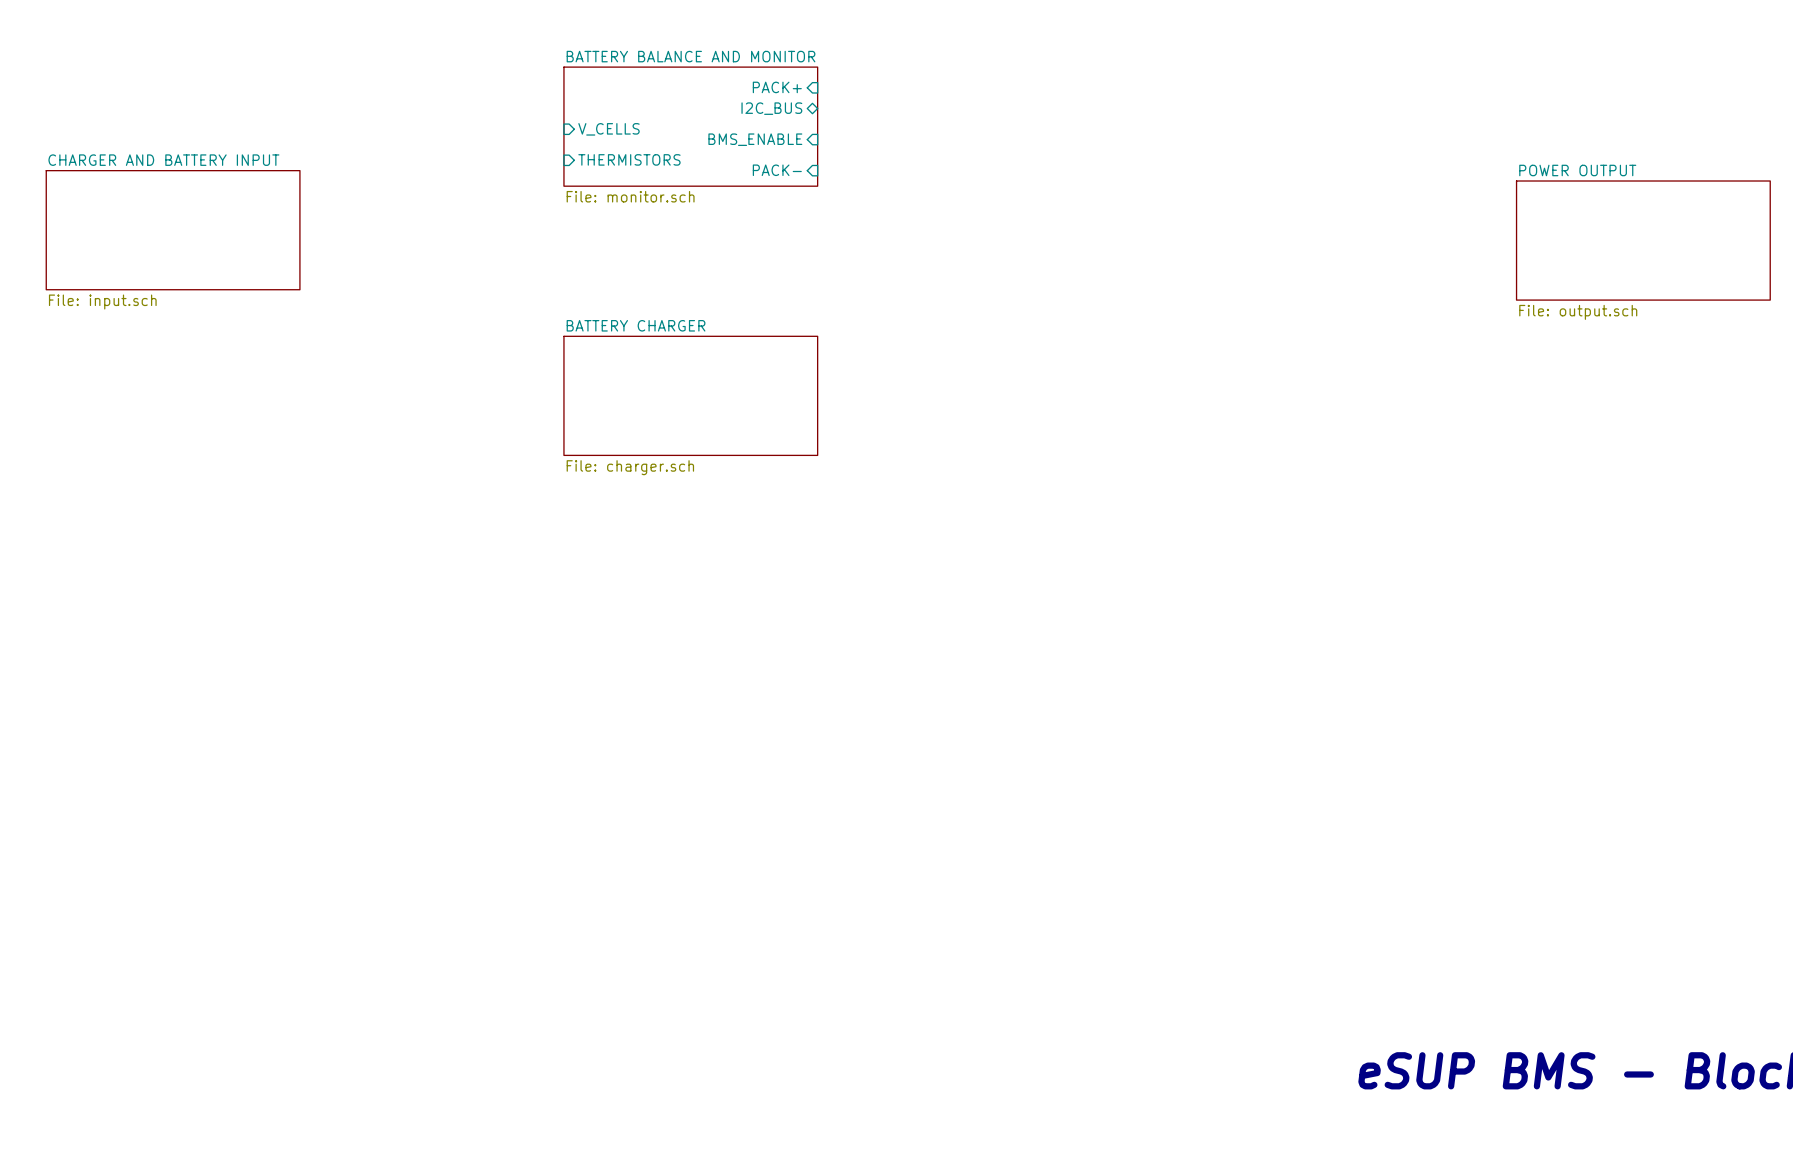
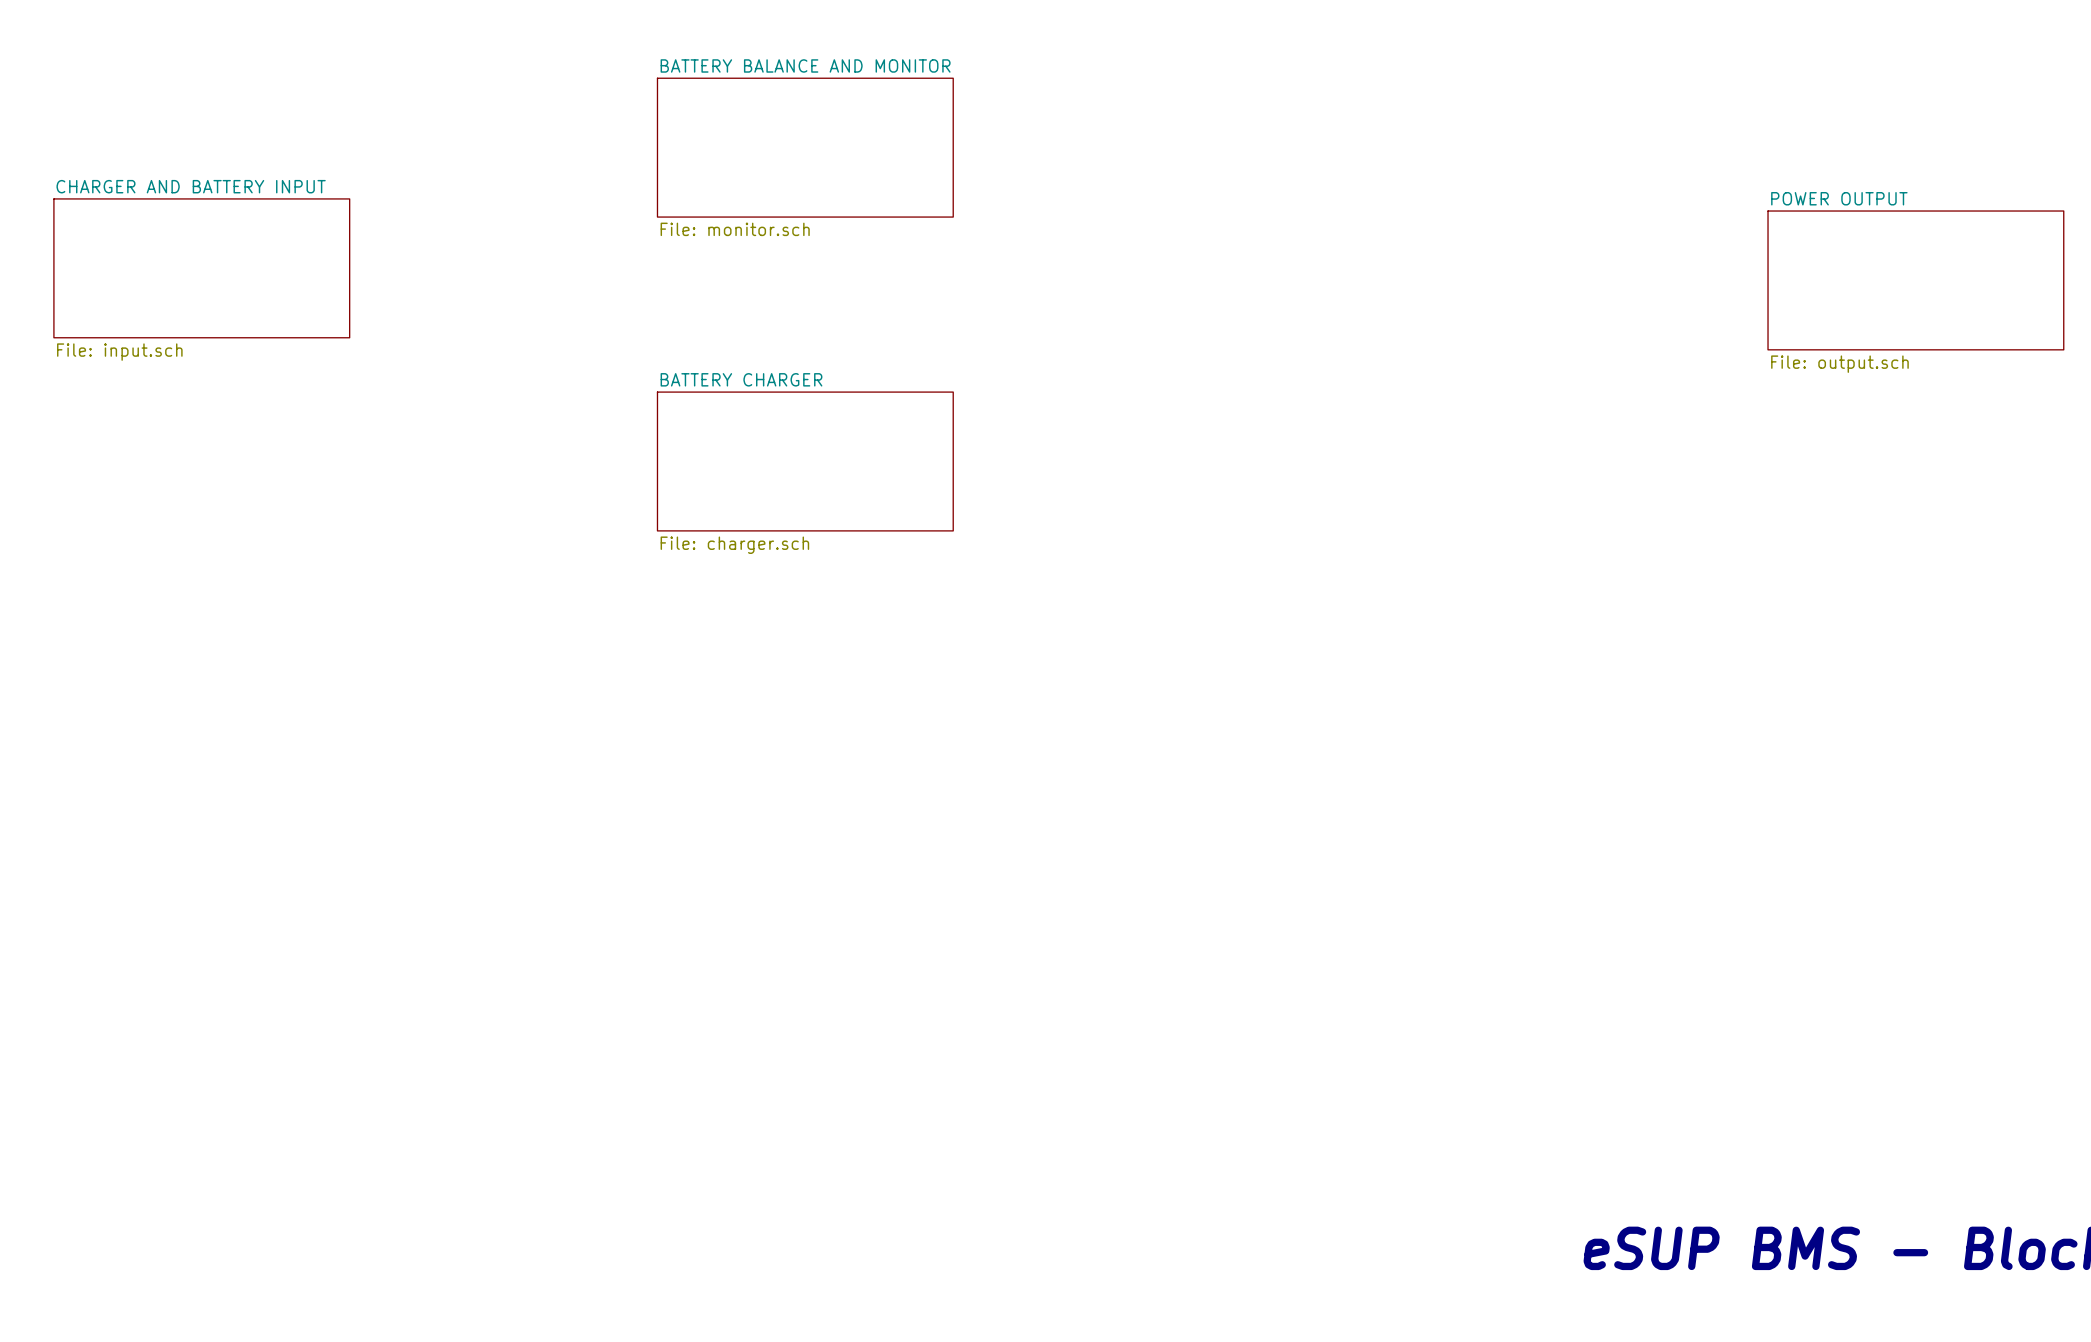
sheet pin: PACK+ (777, 87) -> none
sheet pin: I2C_BUS (771, 108) -> none
sheet pin: V_CELLS (608, 129) -> none
sheet pin: BMS_ENABLE (755, 139) -> none
sheet pin: THERMISTORS (629, 159) -> none
sheet pin: PACK- (777, 170) -> none

